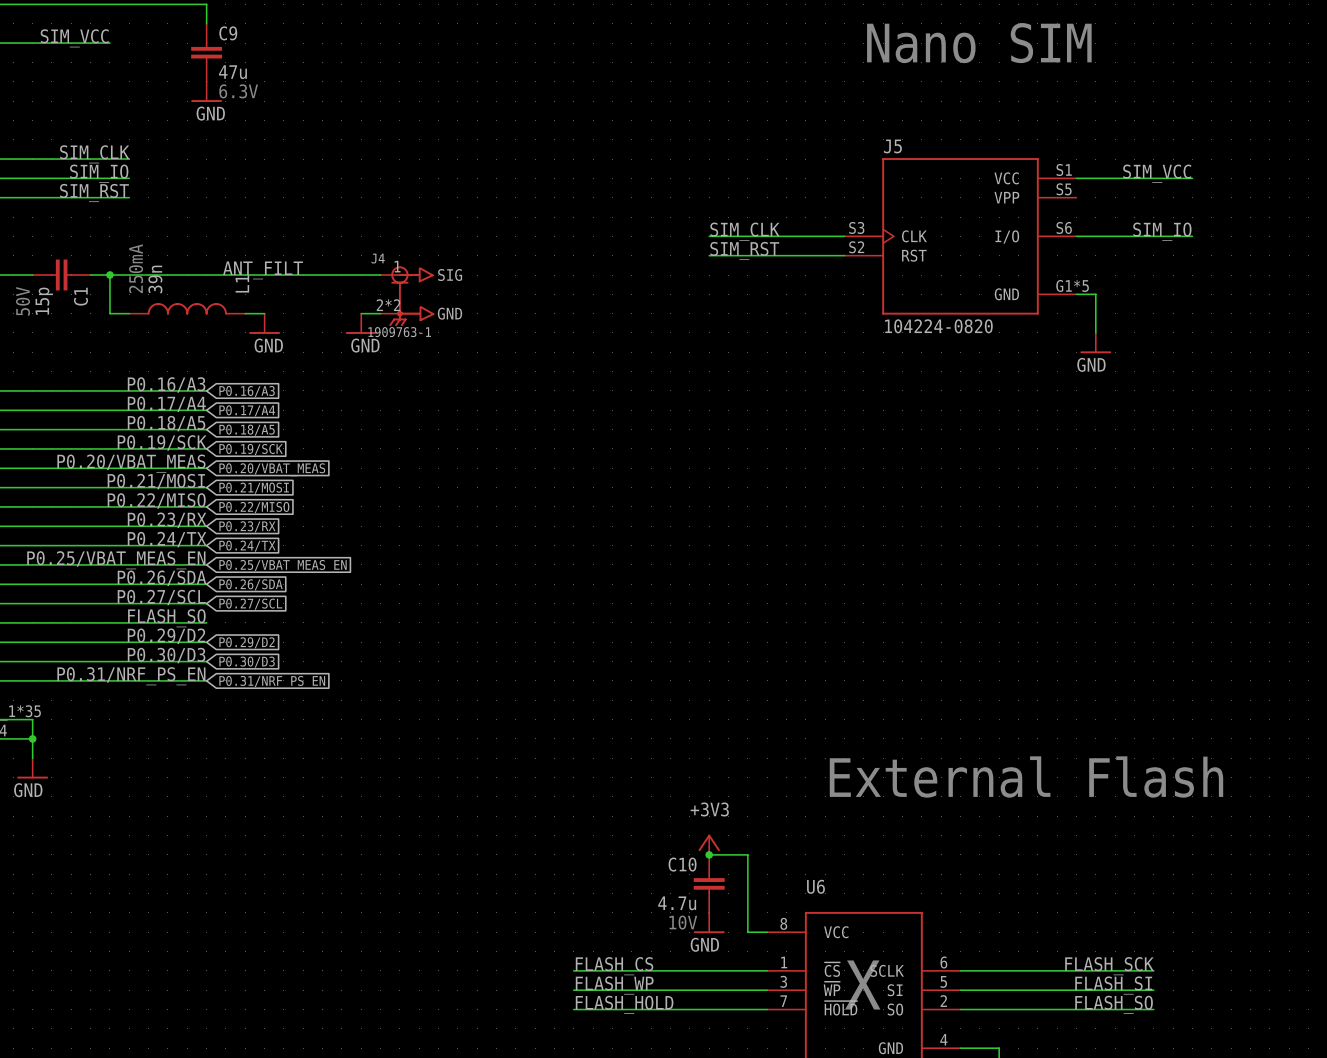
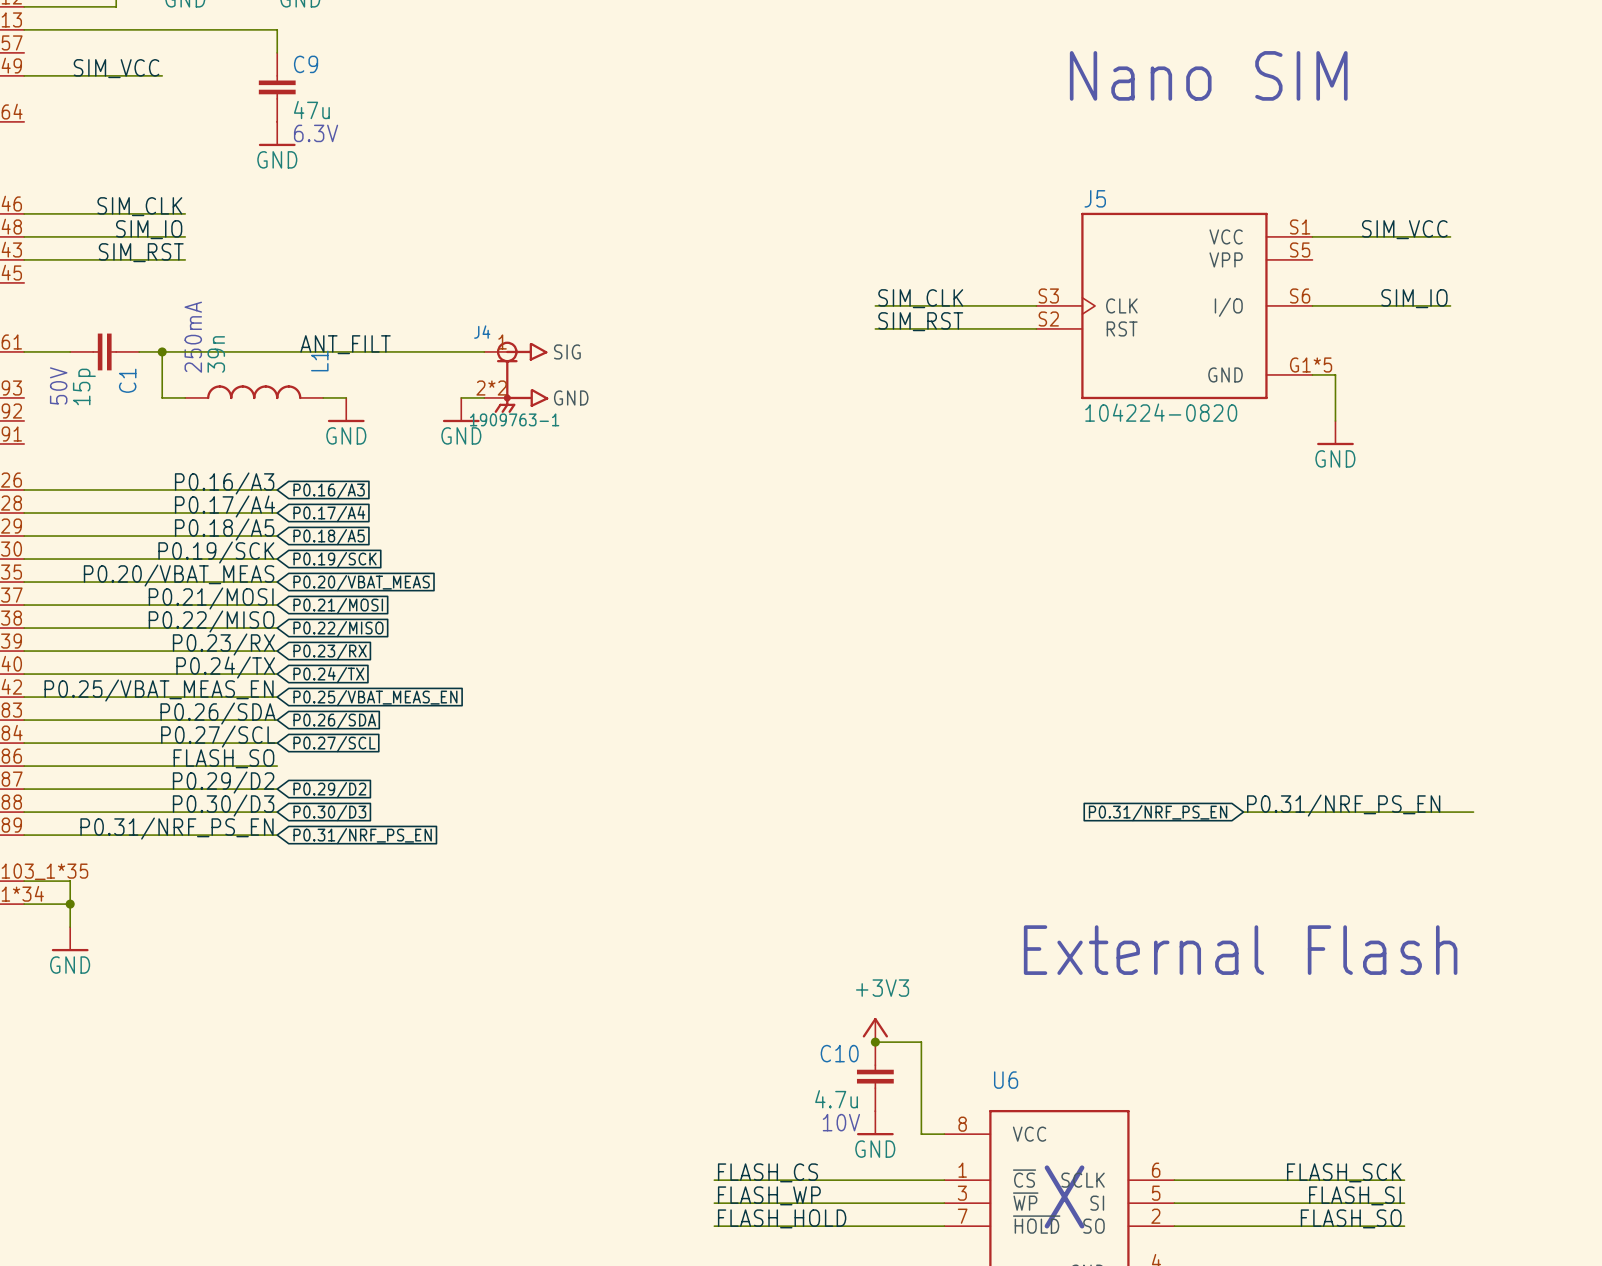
label: none -> P0.31/NRF_PS_EN (1343, 805)
wire: none -> (1243, 812) (1473, 812)
global label: none -> P0.31/NRF_PS_EN (1158, 813)

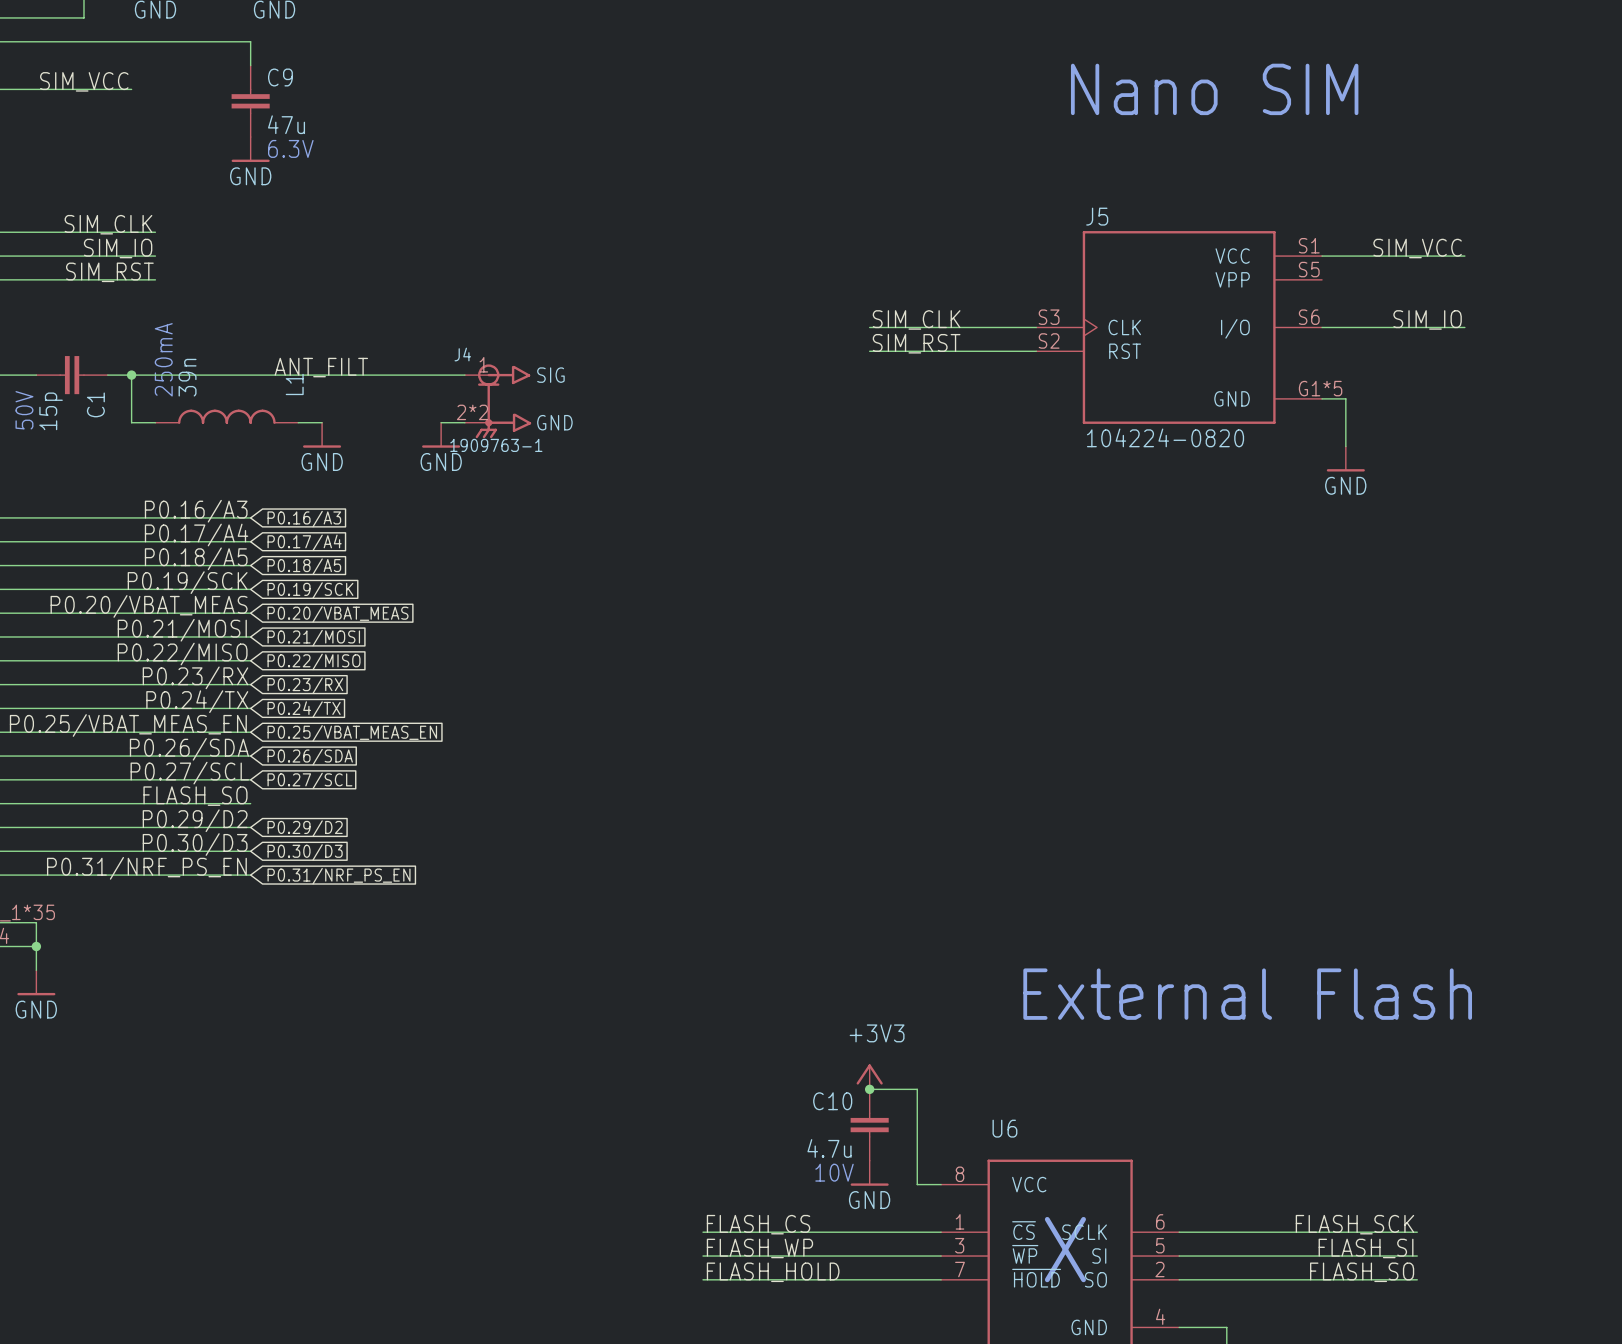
label: P0.31/NRF_PS_EN (1343, 805) -> none
wire: (1243, 812) (1473, 812) -> none
global label: P0.31/NRF_PS_EN (1158, 813) -> none

